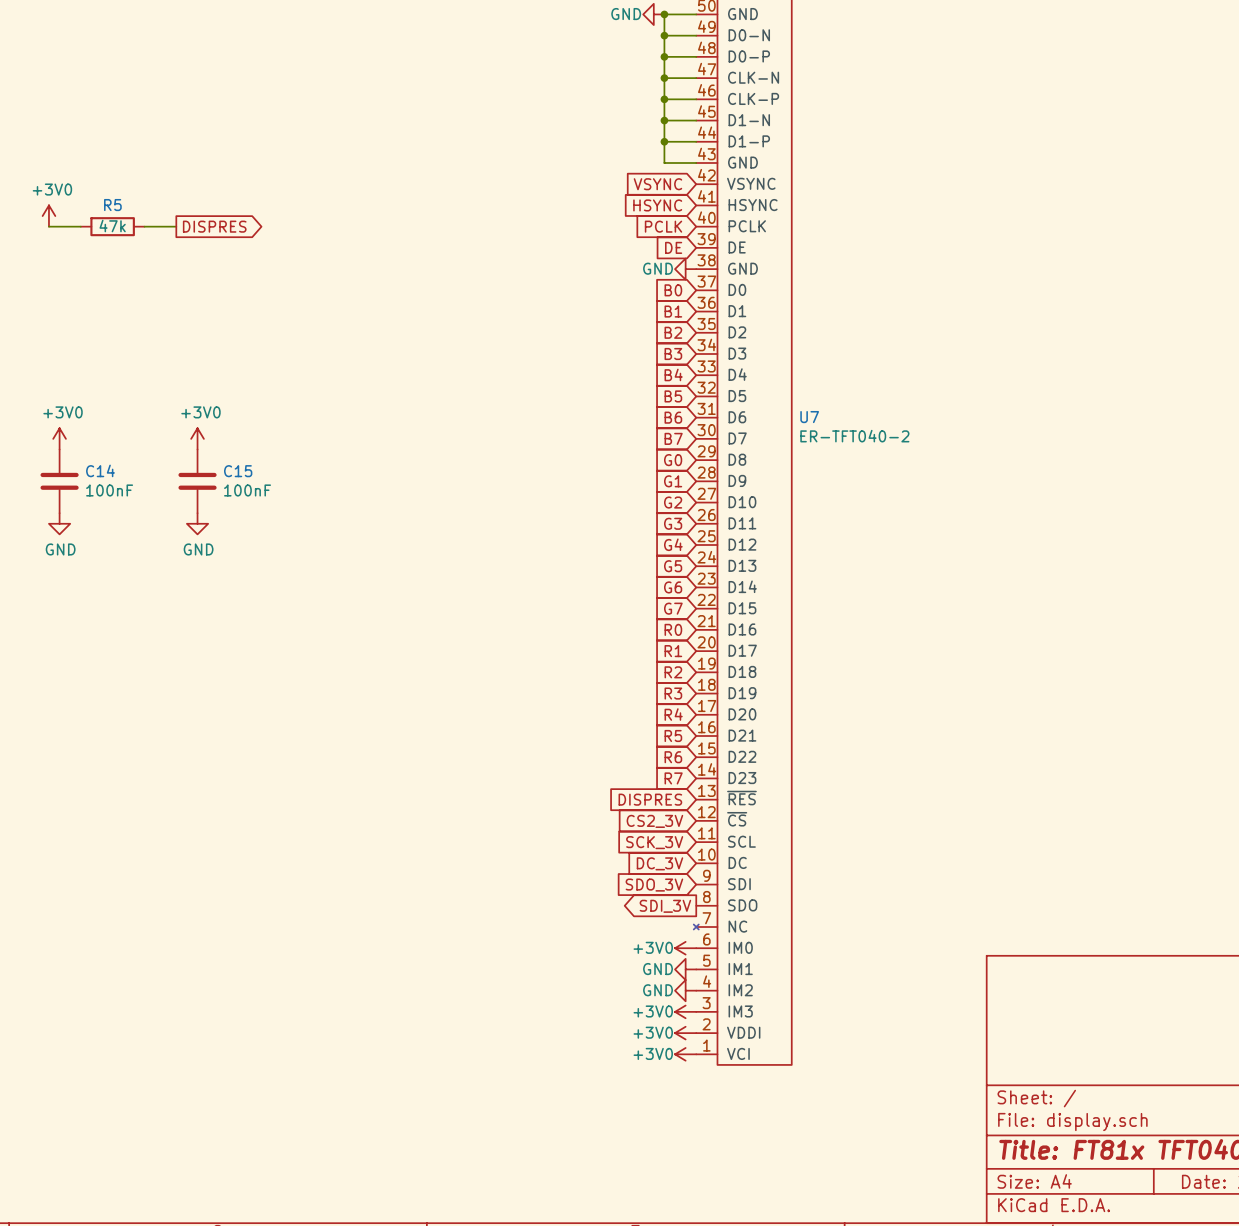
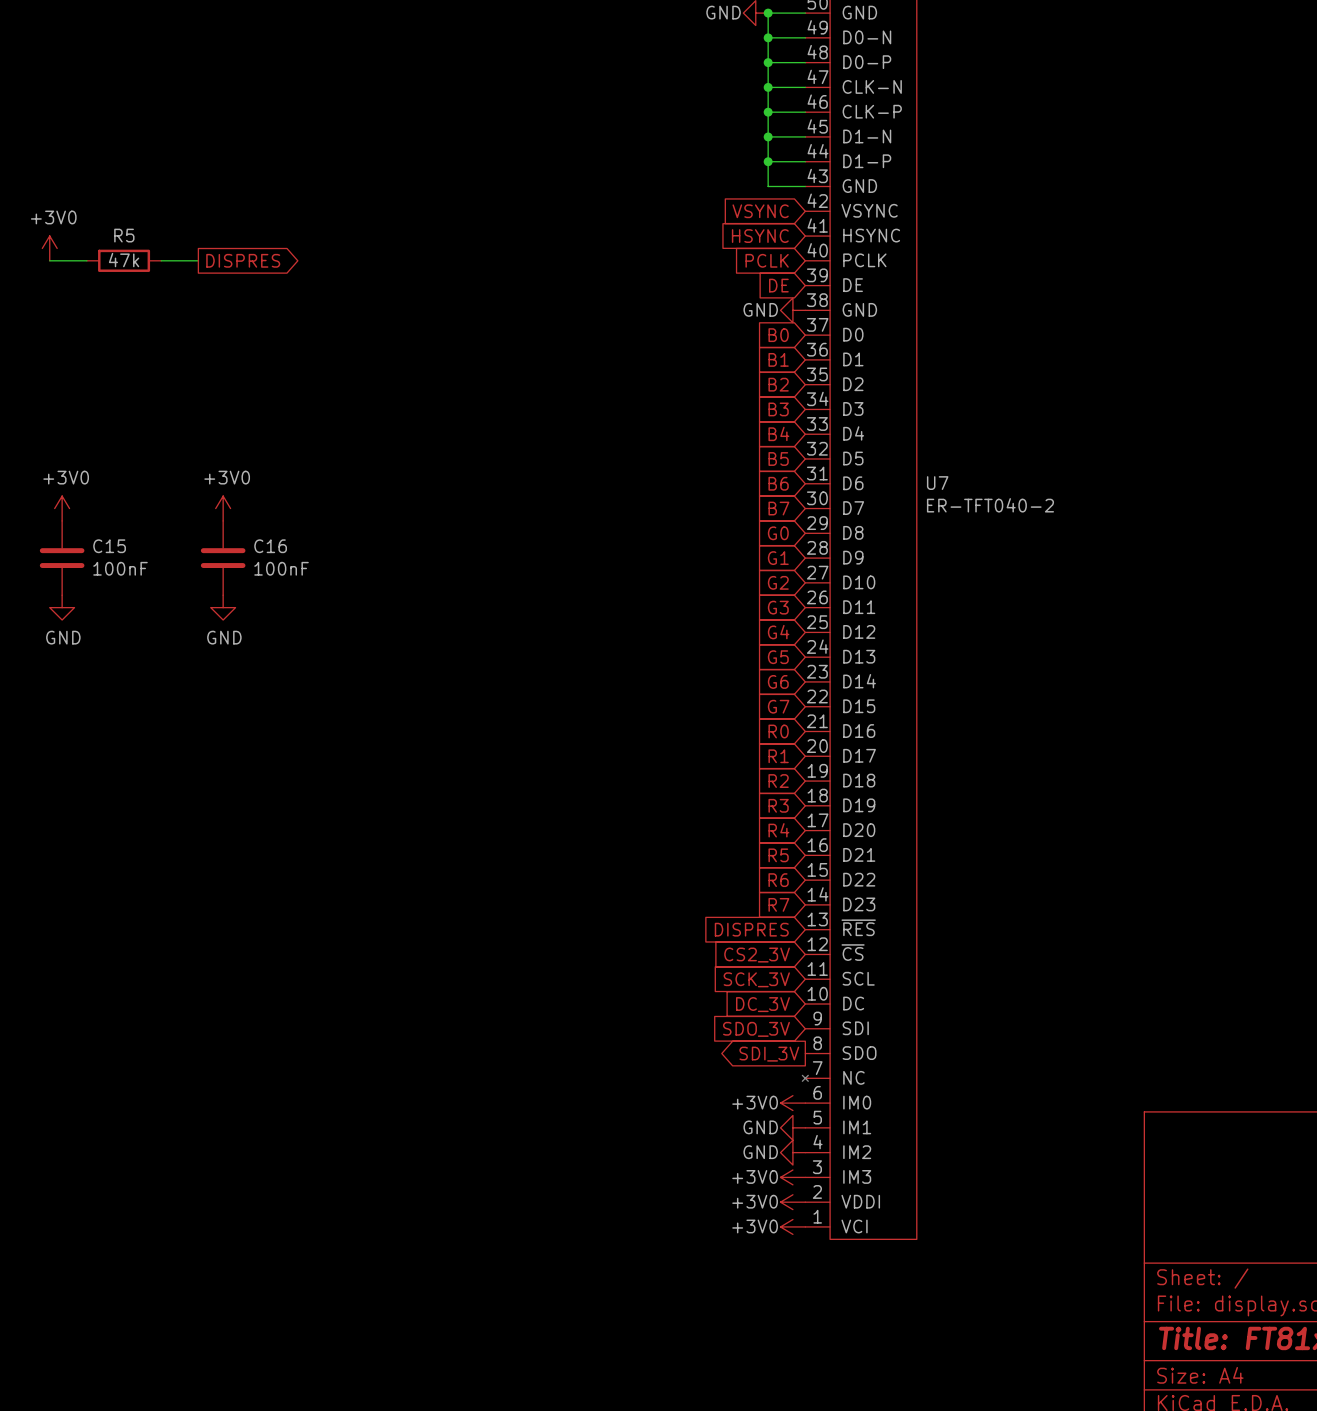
C14 name: C14 (100, 470) -> C15 (109, 546)
C15 name: C15 (238, 471) -> C16 (270, 546)

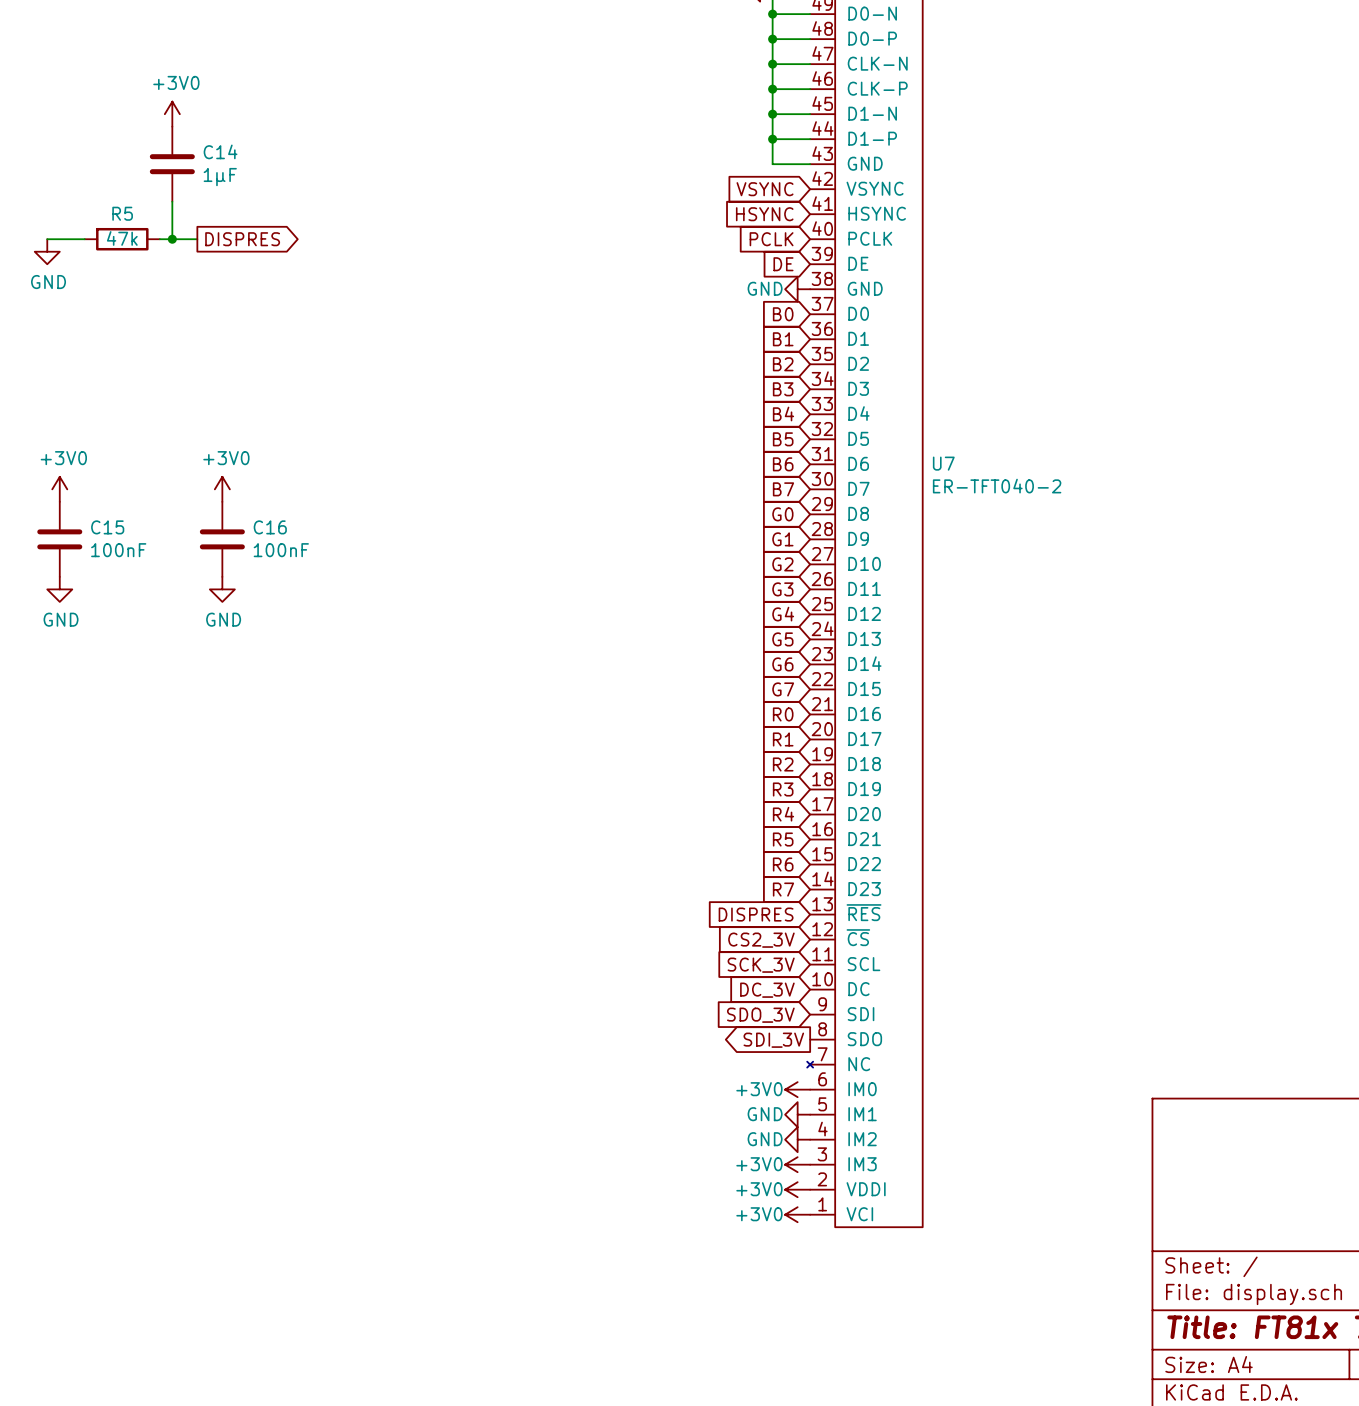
C14: none -> 1µF (172, 164)
wire: none -> (172, 201) (172, 239)
power symbol position: +3V0 (49, 248) -> +3V0 (172, 114)
junction: none -> (172, 239)
power symbol: none -> GND (47, 251)

